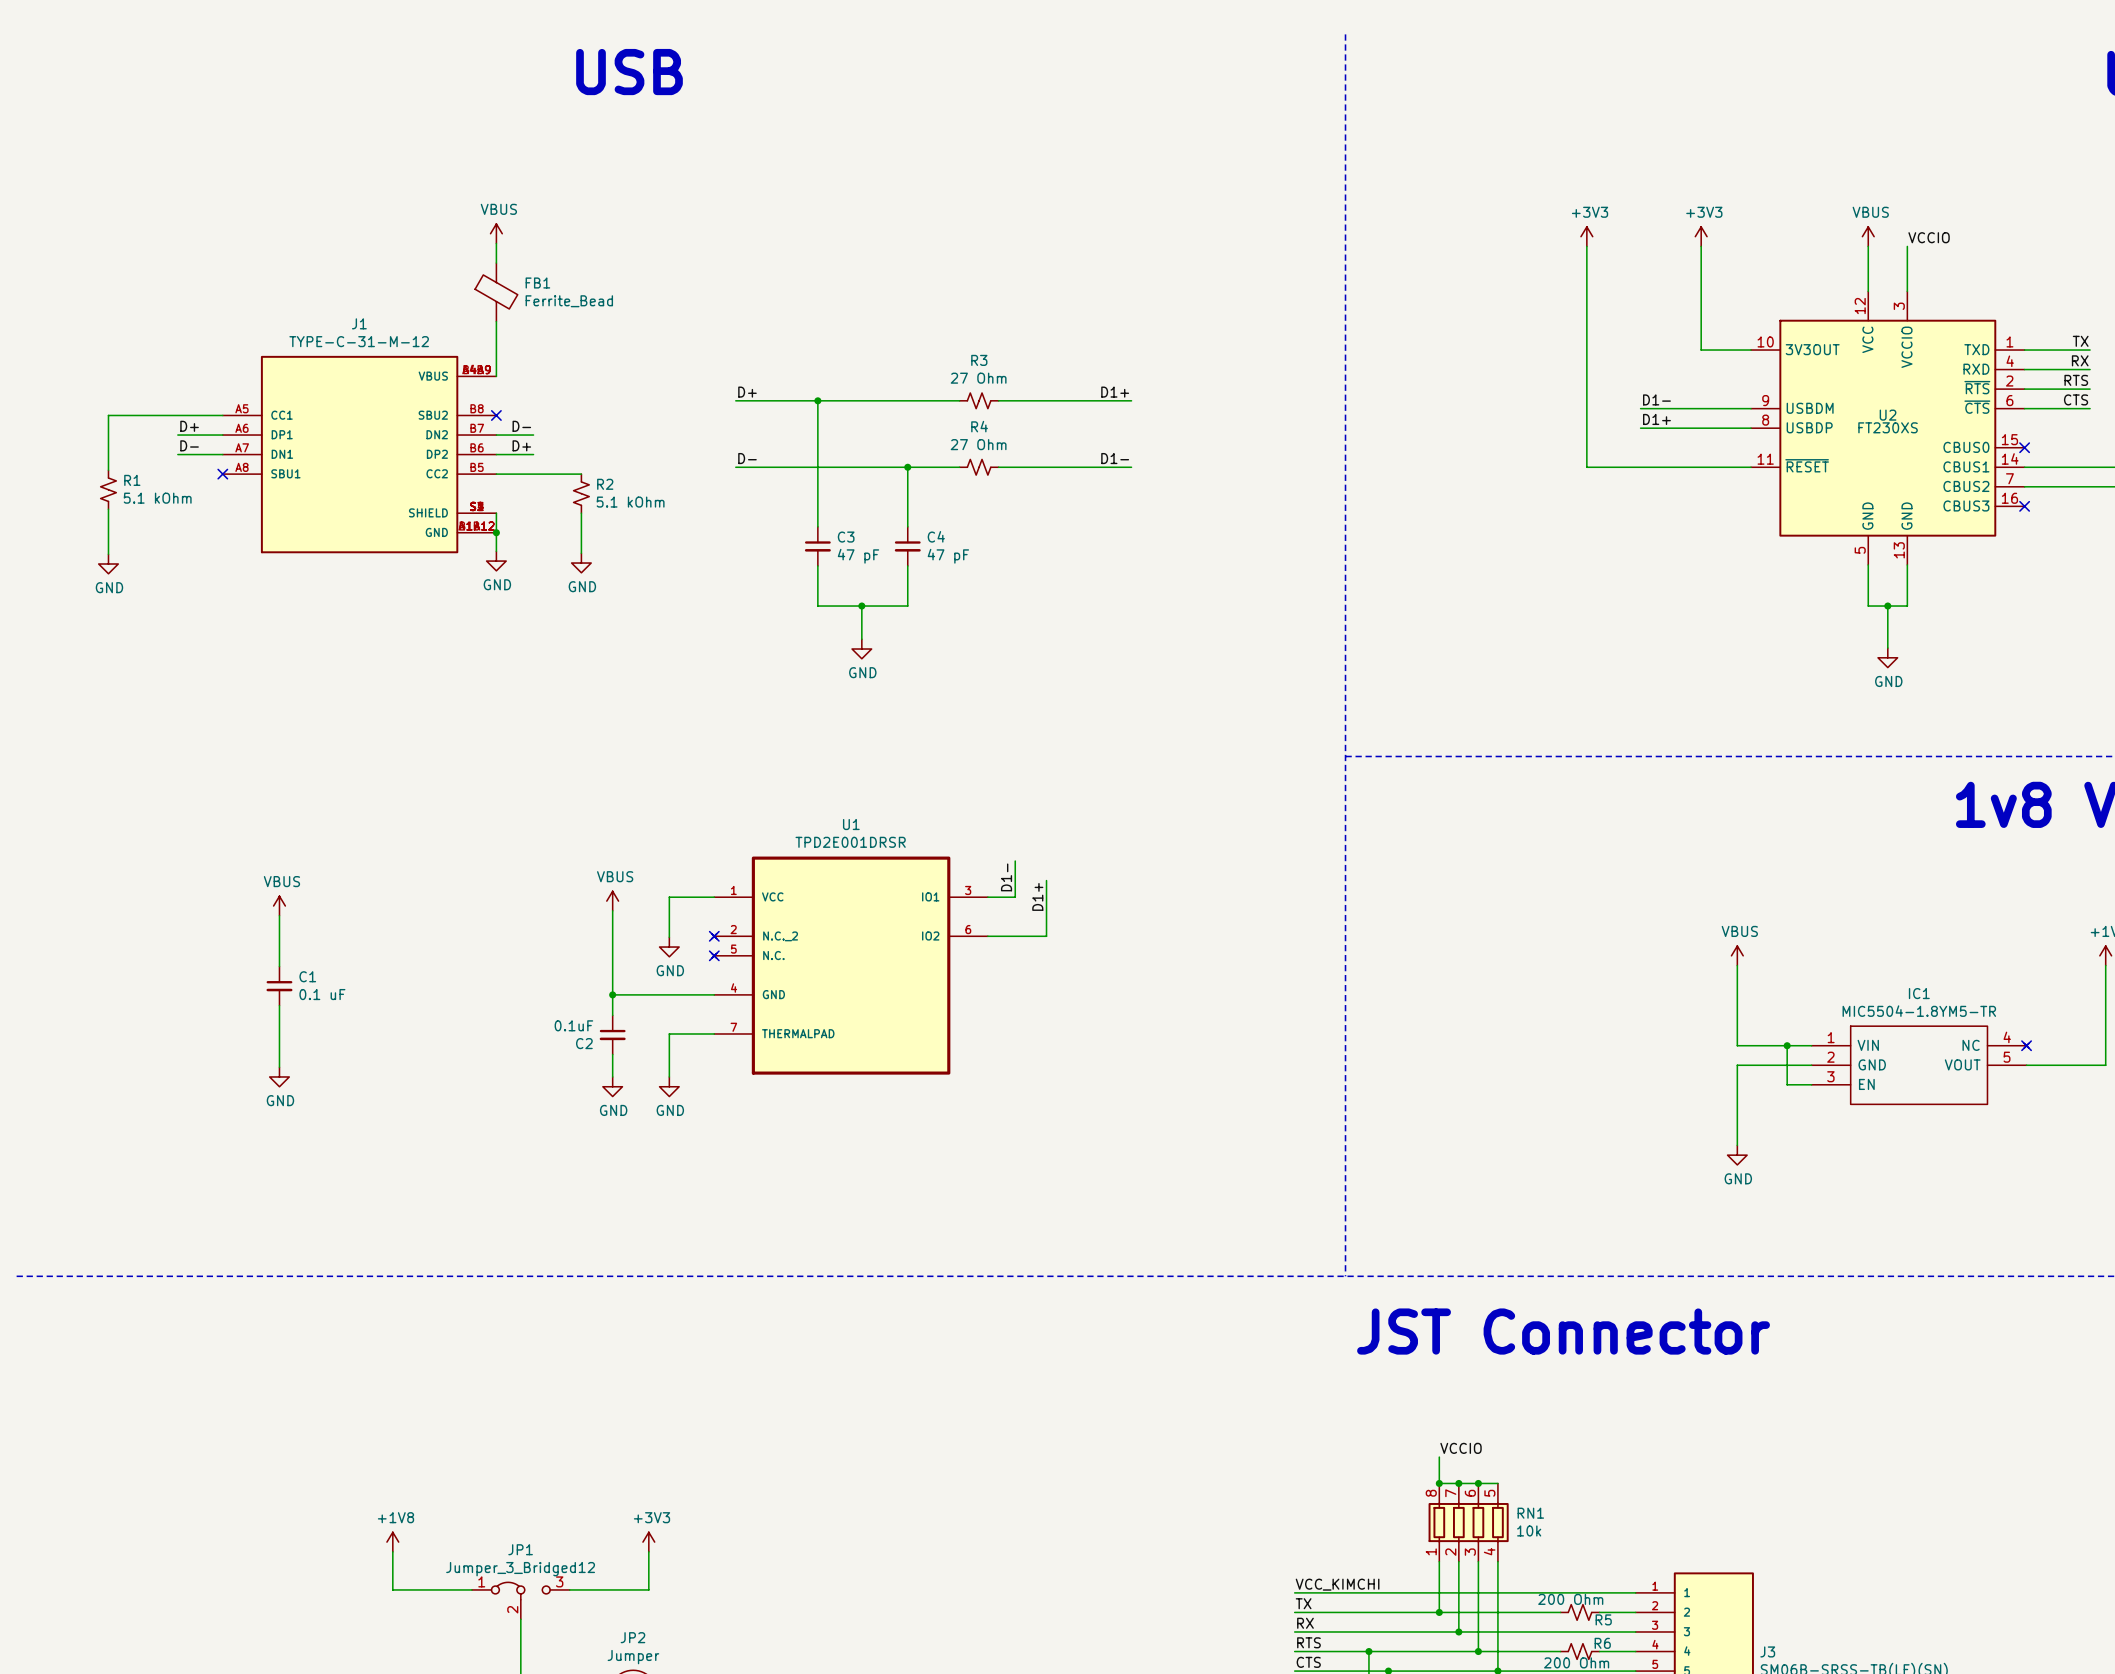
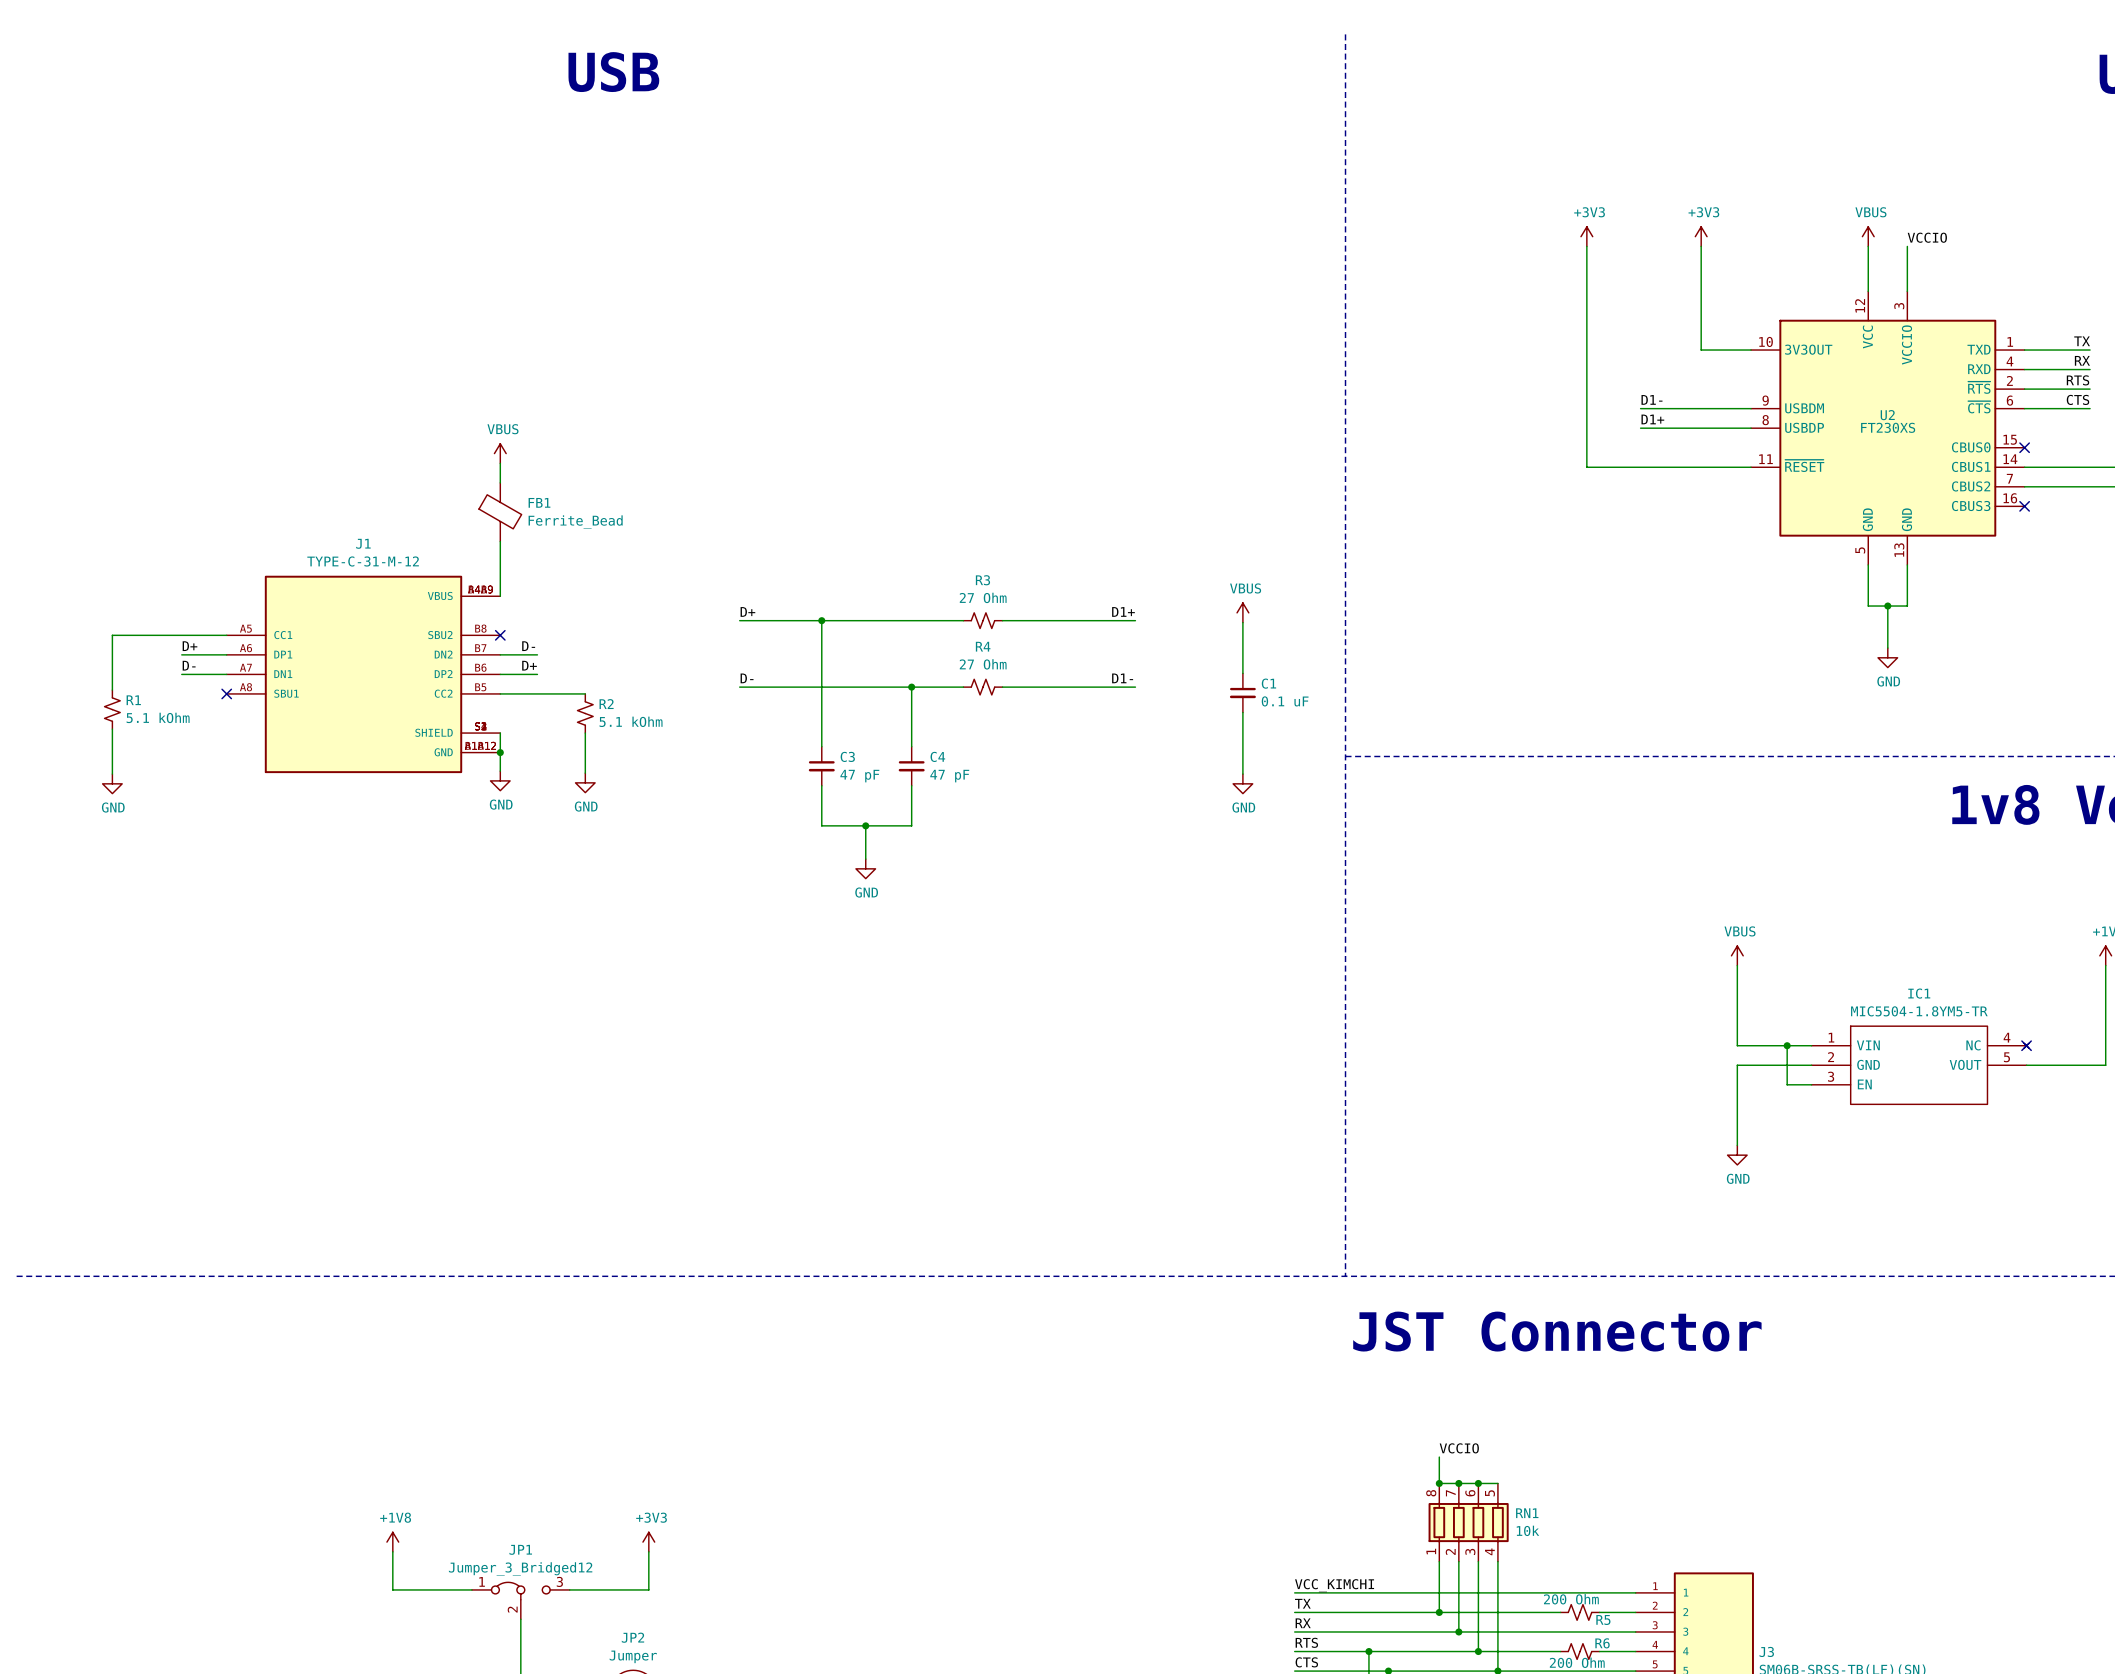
power symbol: VBUS (496, 233) -> none
wire: (496, 243) (496, 263) -> none
FB1 position: (496, 292) -> (500, 512)
wire: (496, 321) (496, 376) -> none
label: D+ (747, 392) -> none
label: D1+ (1115, 392) -> none
wire: (735, 400) (959, 400) -> none
wire: (817, 400) (817, 526) -> none
junction: (817, 400) -> none
R3 position: (979, 400) -> (983, 620)
wire: (998, 400) (1131, 400) -> none
wire: (222, 415) (108, 415) (108, 470) -> none
no-connect mark: (496, 415) -> none
label: D+ (189, 426) -> none
label: D- (521, 426) -> none
wire: (177, 435) (222, 435) -> none
wire: (496, 435) (533, 435) -> none
label: D- (189, 445) -> none
label: D+ (521, 445) -> none
power symbol: none -> VBUS (500, 453)
wire: (177, 454) (222, 454) -> none
J1 position: (359, 454) -> (363, 674)
wire: (496, 454) (533, 454) -> none
label: D- (747, 458) -> none
label: D1- (1115, 458) -> none
wire: none -> (500, 463) (500, 482)
wire: (735, 467) (959, 467) -> (739, 620) (963, 620)
wire: (907, 467) (907, 526) -> none
junction: (907, 467) -> none
R4 position: (979, 467) -> (983, 687)
wire: (998, 467) (1131, 467) -> (1002, 620) (1135, 620)
no-connect mark: (222, 474) -> none
wire: (496, 474) (581, 474) -> none
R1 position: (108, 489) -> (112, 709)
R2 position: (581, 493) -> (585, 713)
wire: (108, 509) (108, 554) -> none
wire: (496, 513) (496, 551) -> none
wire: (581, 513) (581, 553) -> none
junction: (496, 532) -> none
wire: none -> (500, 541) (500, 596)
C3 position: (817, 546) -> (821, 766)
C4 position: (907, 546) -> (911, 766)
power symbol: GND (496, 561) -> none
power symbol: GND (581, 563) -> none
power symbol: GND (108, 564) -> none
wire: (817, 565) (817, 606) (907, 606) (907, 565) -> none
wire: (861, 606) (861, 639) -> none
junction position: (861, 606) -> (821, 620)
label: none -> D+ (747, 611)
label: none -> D1+ (1123, 611)
power symbol: none -> VBUS (1242, 612)
wire: none -> (821, 620) (821, 746)
wire: none -> (1242, 622) (1242, 673)
wire: none -> (226, 635) (112, 635) (112, 690)
no-connect mark: none -> (500, 635)
label: none -> D+ (189, 646)
label: none -> D- (528, 646)
power symbol: GND (861, 649) -> none
wire: none -> (181, 654) (226, 654)
wire: none -> (500, 654) (537, 654)
label: none -> D- (189, 665)
label: none -> D+ (529, 665)
wire: none -> (181, 674) (226, 674)
wire: none -> (500, 674) (537, 674)
label: none -> D- (747, 678)
label: none -> D1- (1122, 678)
wire: none -> (739, 687) (963, 687)
wire: none -> (911, 687) (911, 746)
junction: none -> (911, 687)
wire: none -> (1002, 687) (1135, 687)
no-connect mark: none -> (226, 693)
wire: none -> (500, 693) (585, 693)
wire: none -> (1242, 712) (1242, 774)
wire: none -> (112, 729) (112, 774)
wire: none -> (500, 733) (500, 771)
wire: none -> (585, 733) (585, 773)
junction: none -> (500, 752)
power symbol: none -> GND (500, 780)
power symbol: none -> GND (585, 782)
power symbol: none -> GND (112, 783)
power symbol: none -> GND (1242, 783)
wire: none -> (821, 785) (821, 825) (911, 825) (911, 785)
wire: none -> (865, 825) (865, 859)
junction: none -> (865, 825)
wire: (1015, 861) (1015, 897) (987, 897) -> none
power symbol: none -> GND (865, 868)
label: D1- (1006, 877) -> none
wire: (1046, 880) (1046, 936) (987, 936) -> none
label: D1+ (1037, 896) -> none
wire: (714, 897) (669, 897) (669, 937) -> none
power symbol: VBUS (612, 901) -> none
power symbol: VBUS (279, 905) -> none
wire: (612, 910) (612, 1015) -> none
wire: (279, 915) (279, 966) -> none
no-connect mark: (714, 936) -> none
power symbol: GND (669, 947) -> none
no-connect mark: (714, 955) -> none
U1: TPD2E001DRSR (849, 965) -> none
C1 position: (279, 986) -> (1242, 692)
wire: (612, 994) (714, 994) -> none
junction: (612, 994) -> none
wire: (279, 1005) (279, 1067) -> none
wire: (714, 1033) (669, 1033) (669, 1076) -> none
C2: 0.1uF (612, 1034) -> none
wire: (612, 1054) (612, 1076) -> none
power symbol: GND (279, 1076) -> none
power symbol: GND (612, 1086) -> none
power symbol: GND (669, 1086) -> none

